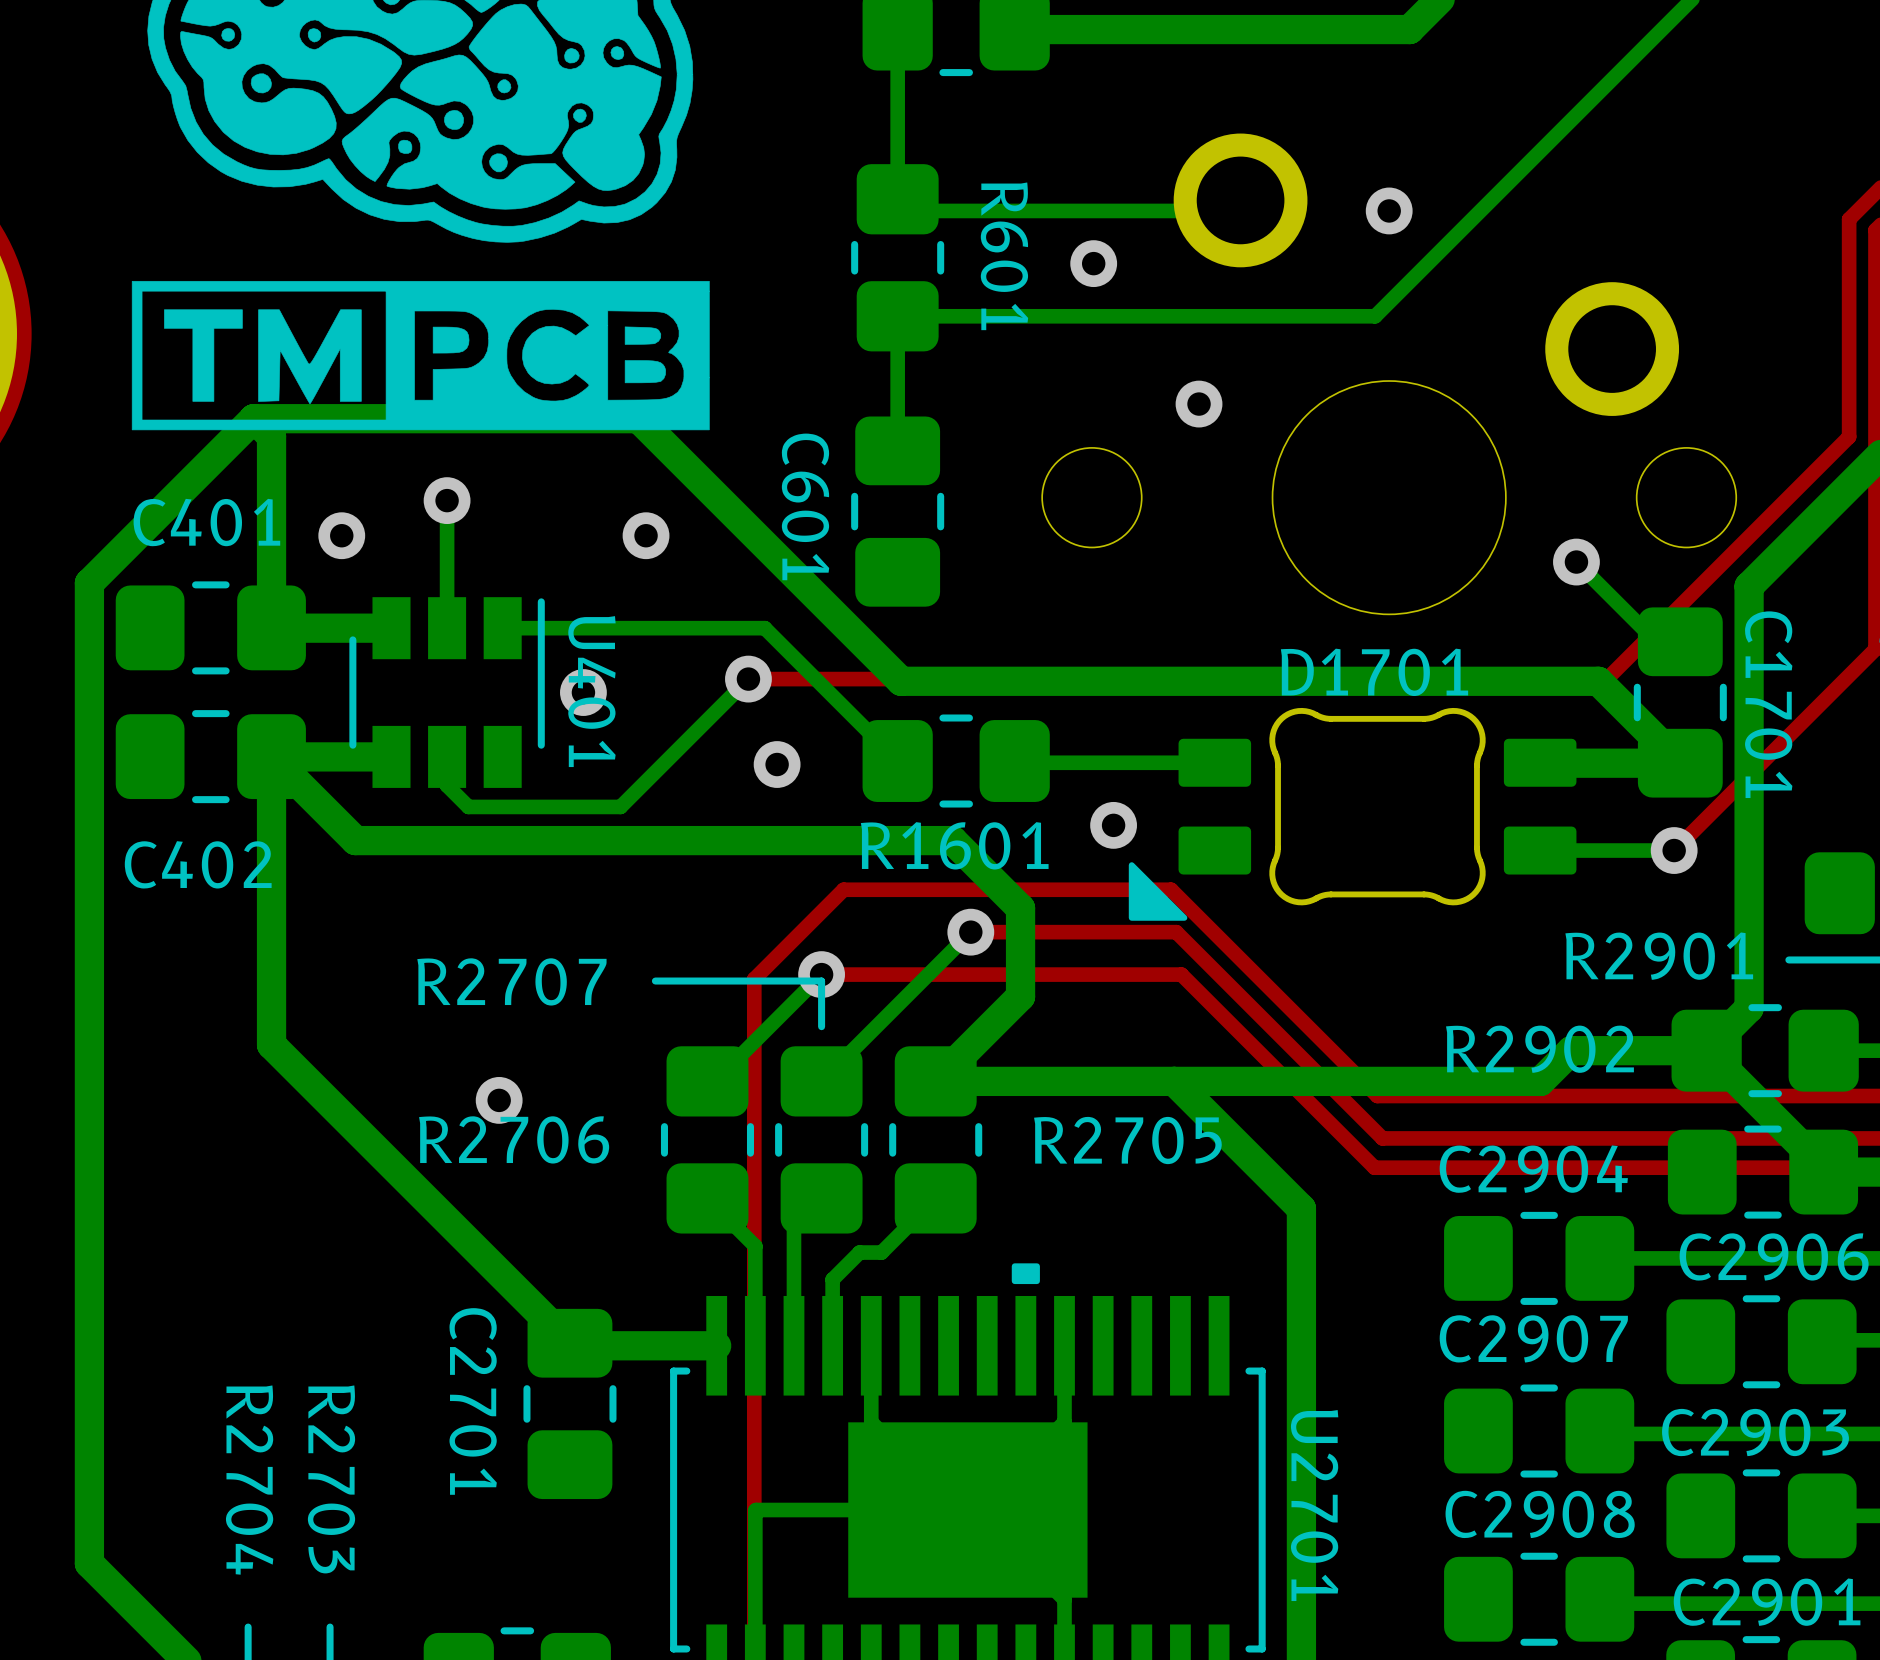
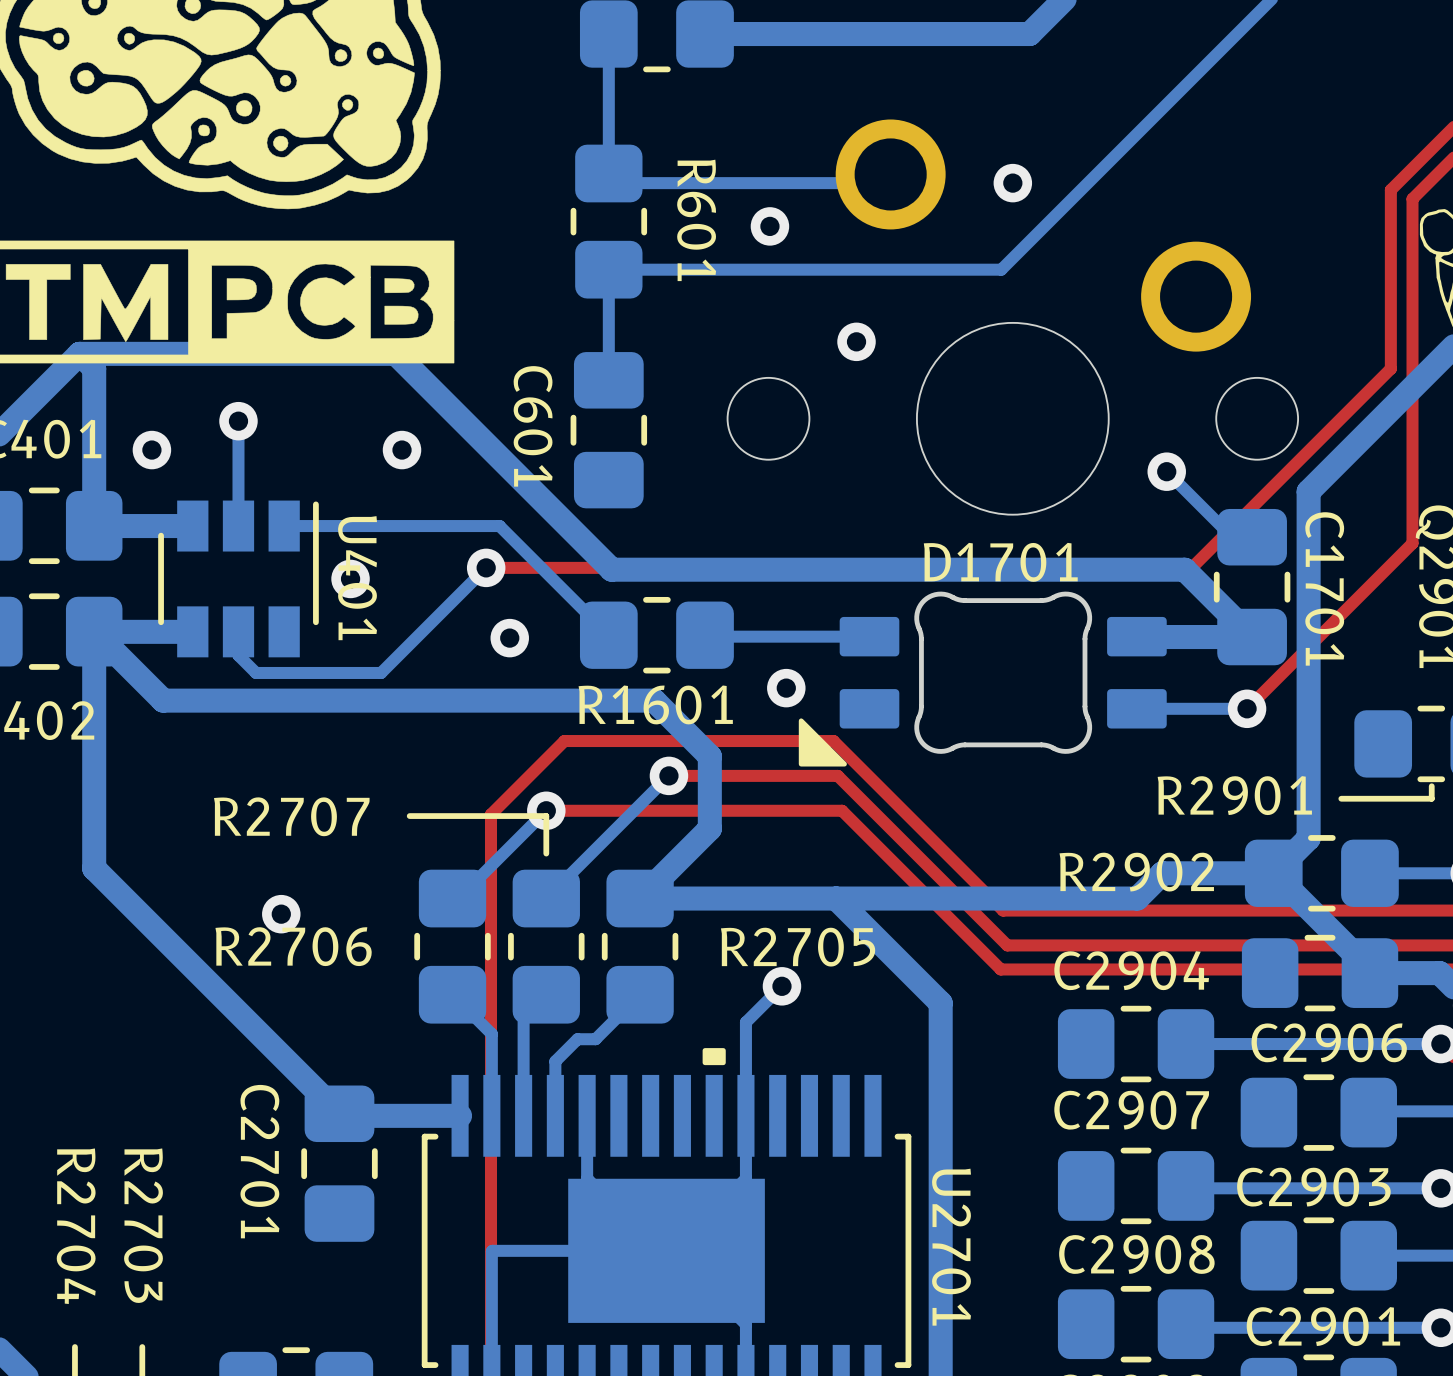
bottom track: none -> (781, 986) (745, 1022) (745, 1115)
via: none -> (781, 986)

